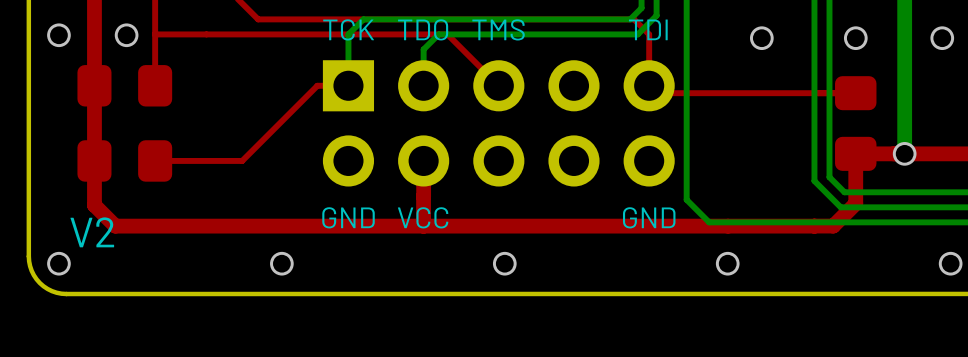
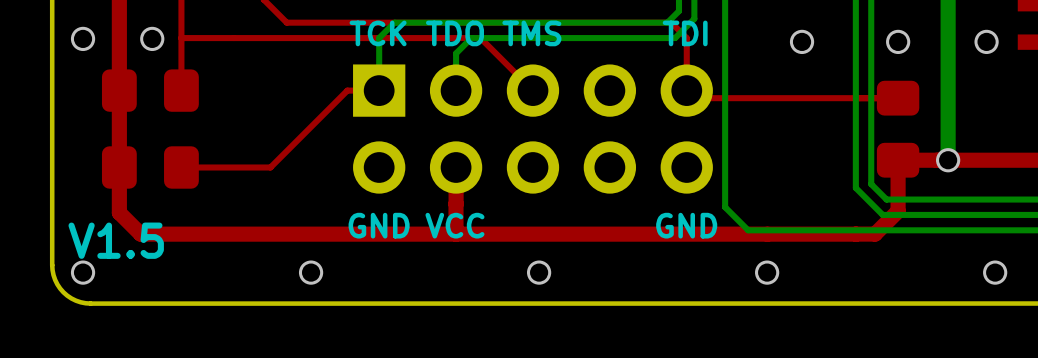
text: V2 (92, 232) -> V1.5 (116, 240)

